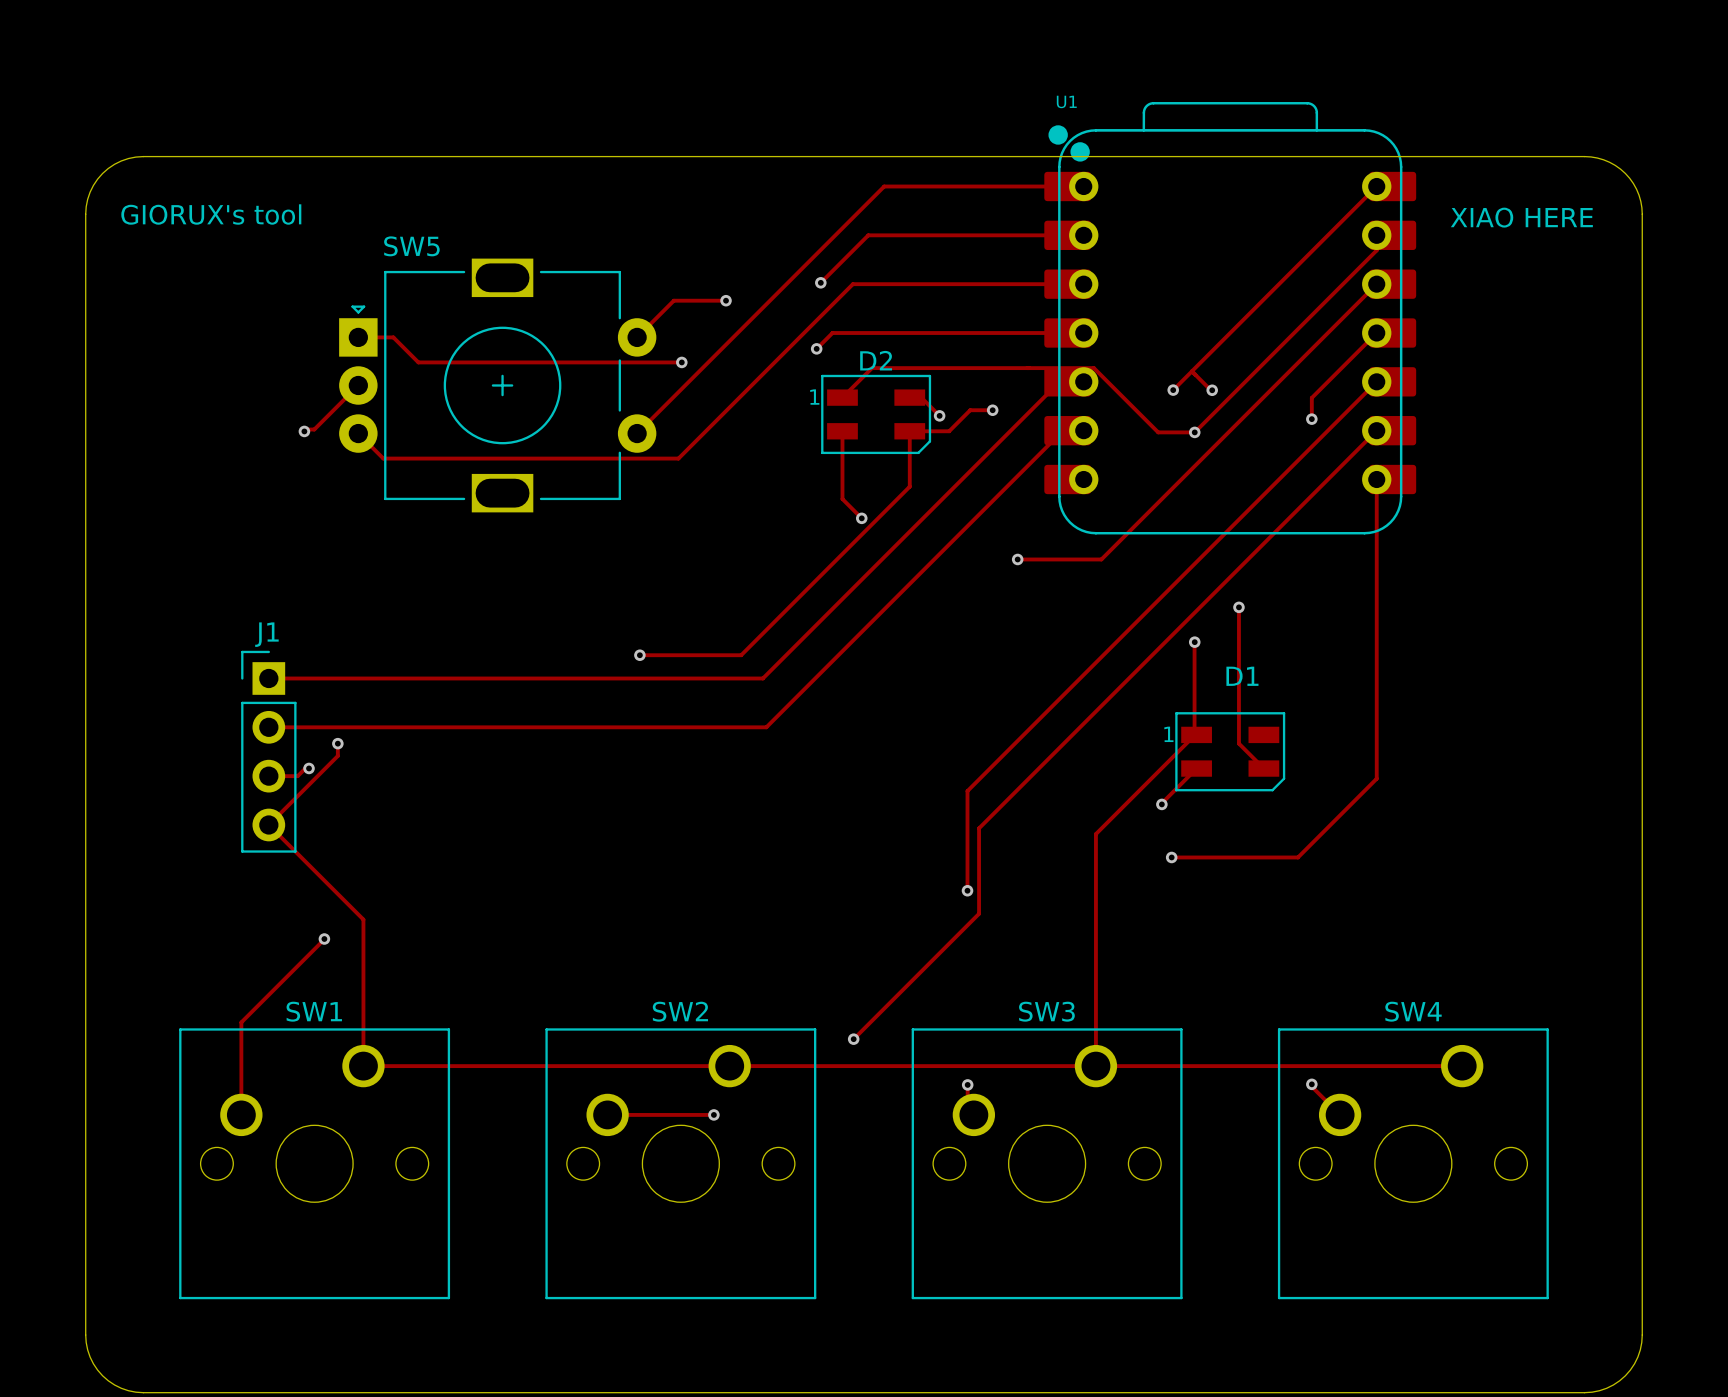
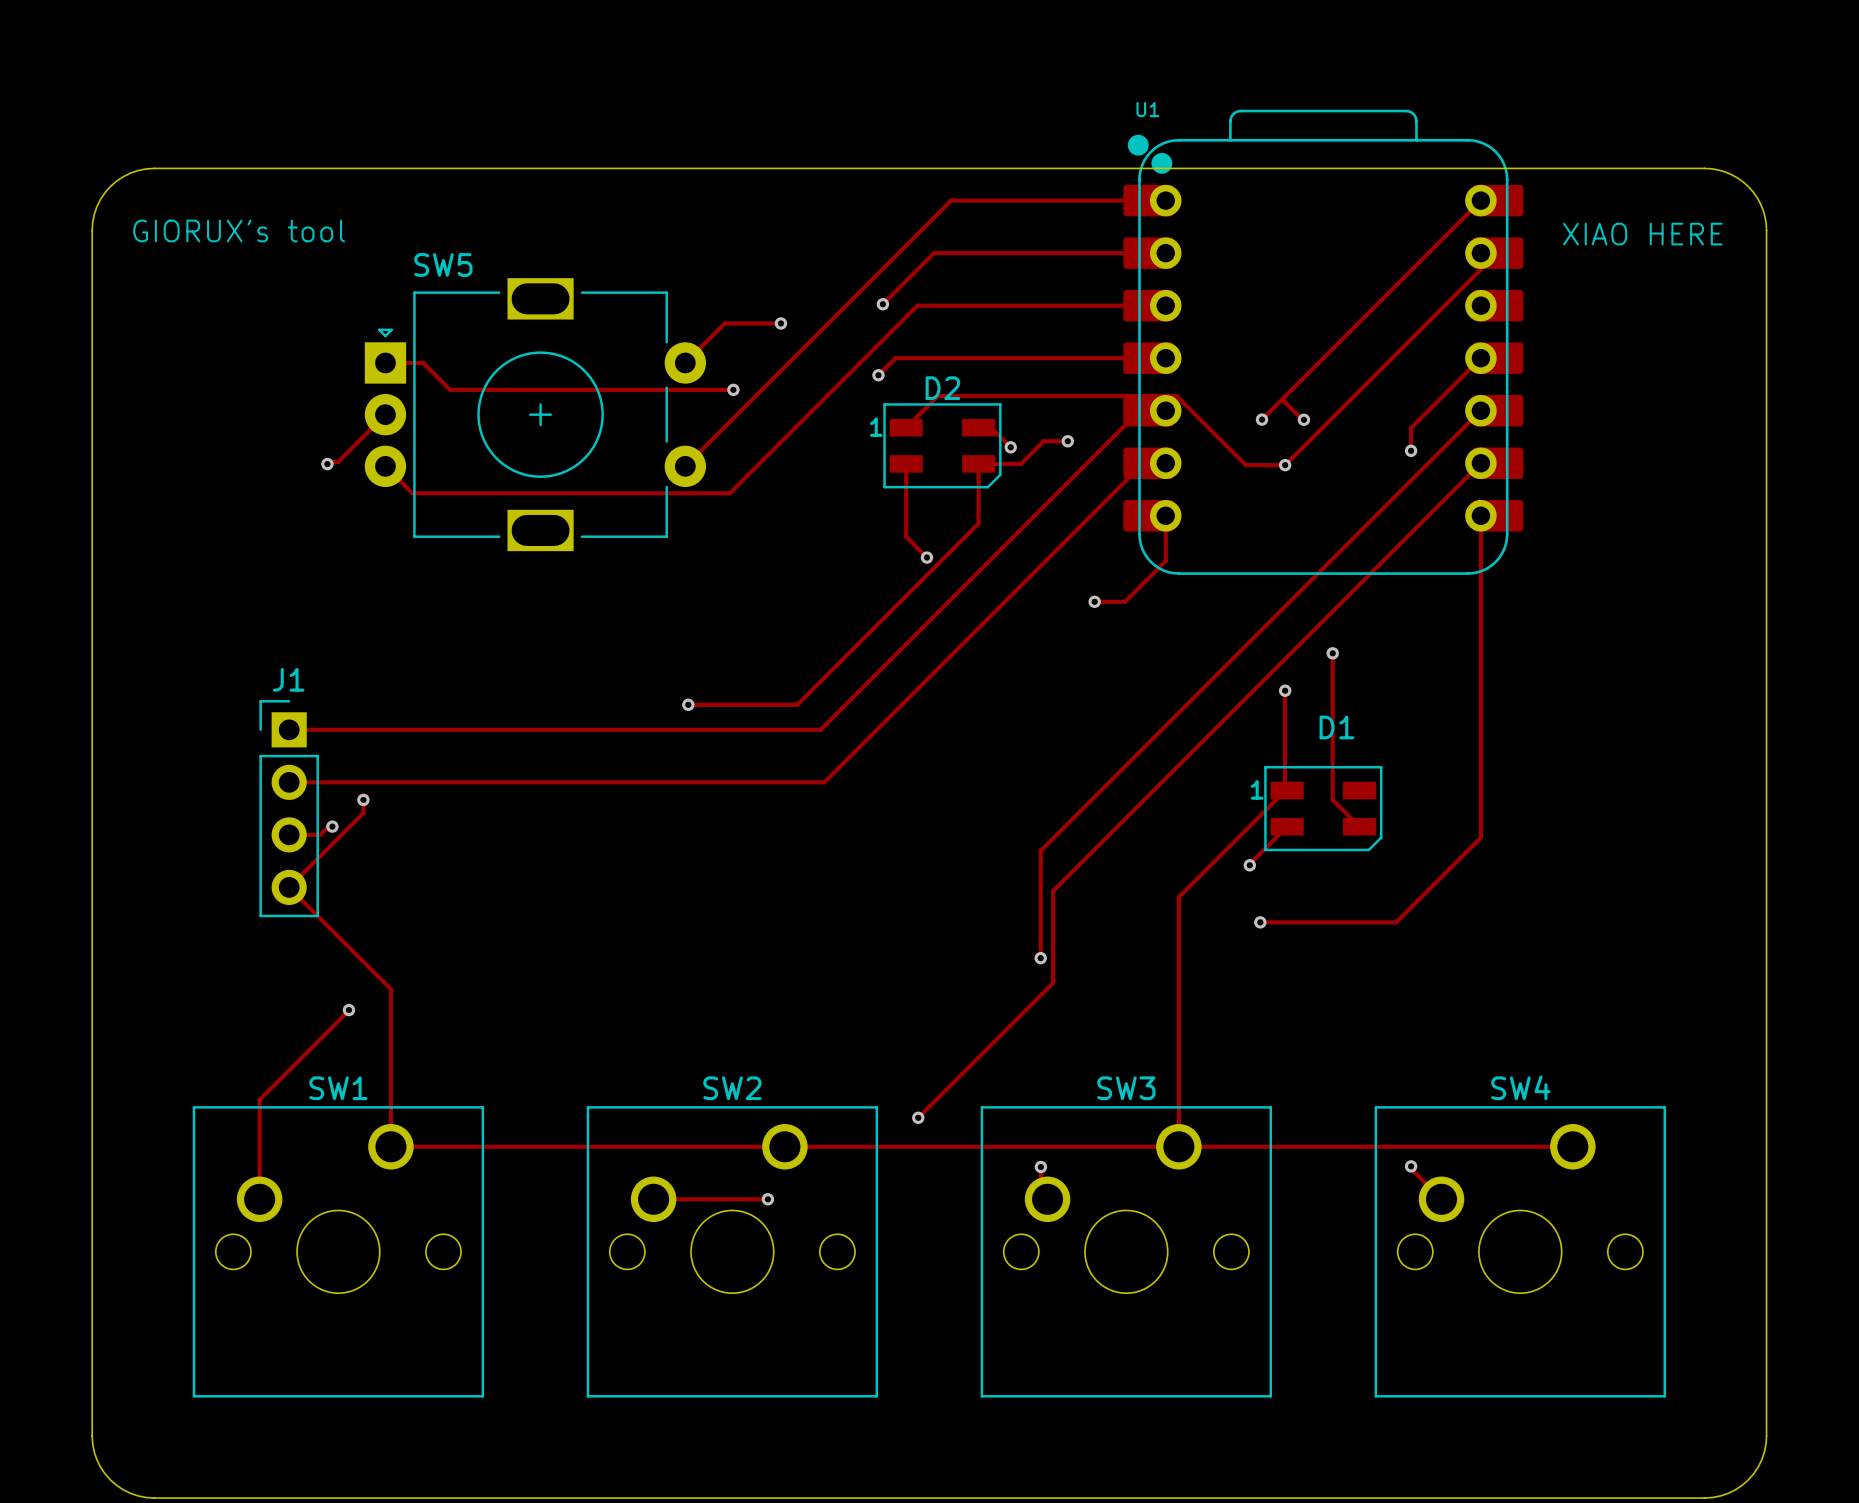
track: (1376, 284) (1101, 559) (1045, 559) -> (1165, 515) (1165, 561) (1125, 601)

